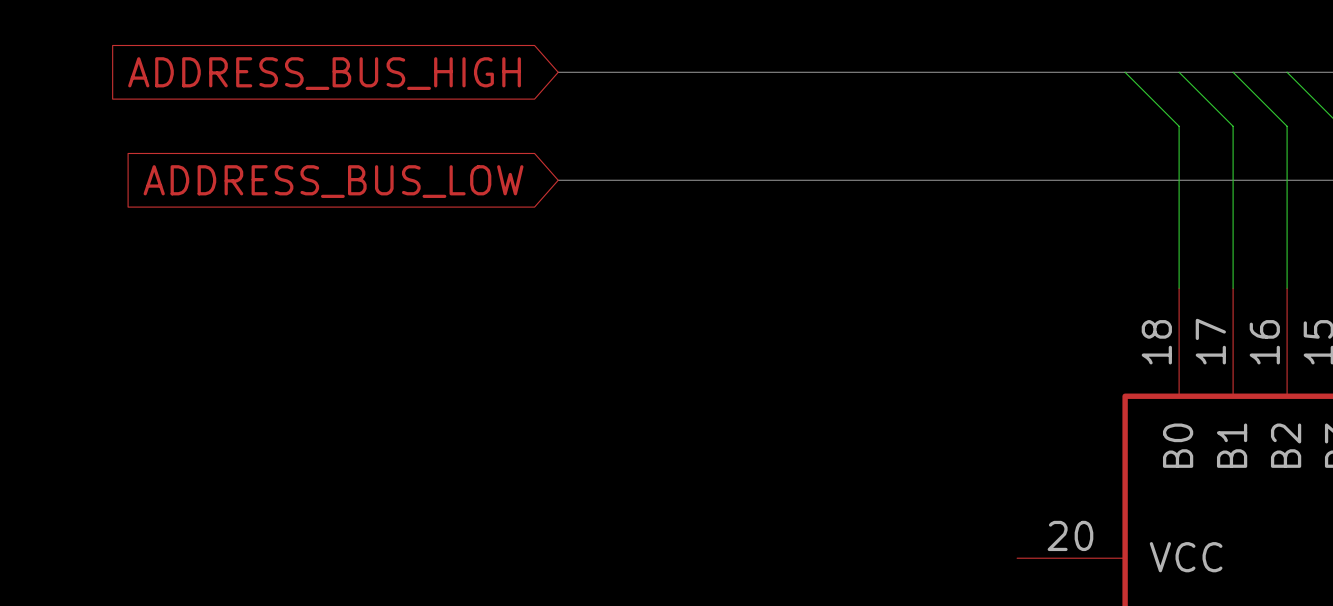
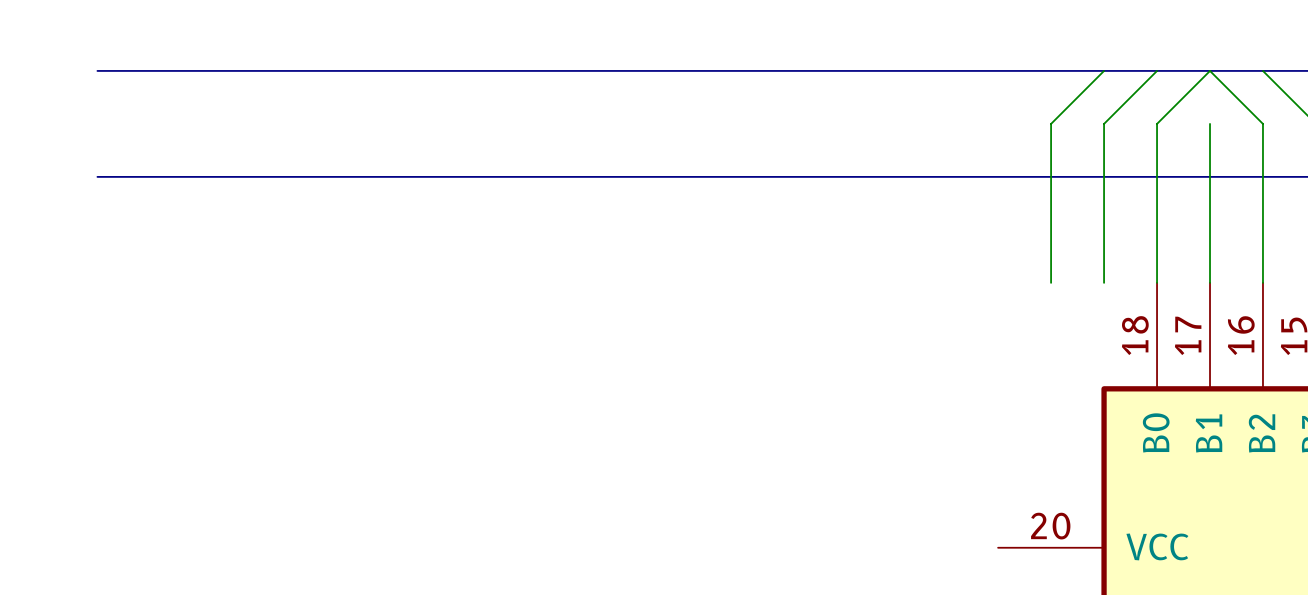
bus: none -> (97, 70) (547, 70)
wire: (1125, 72) (1179, 126) -> (1210, 70) (1157, 123)
wire: none -> (1104, 70) (1051, 123) (1051, 282)
wire: (1179, 72) (1233, 126) -> (1157, 70) (1104, 123) (1104, 282)
global label: ADDRESS_BUS_HIGH (324, 73) -> none
bus: none -> (97, 176) (547, 176)
global label: ADDRESS_BUS_LOW (333, 181) -> none

